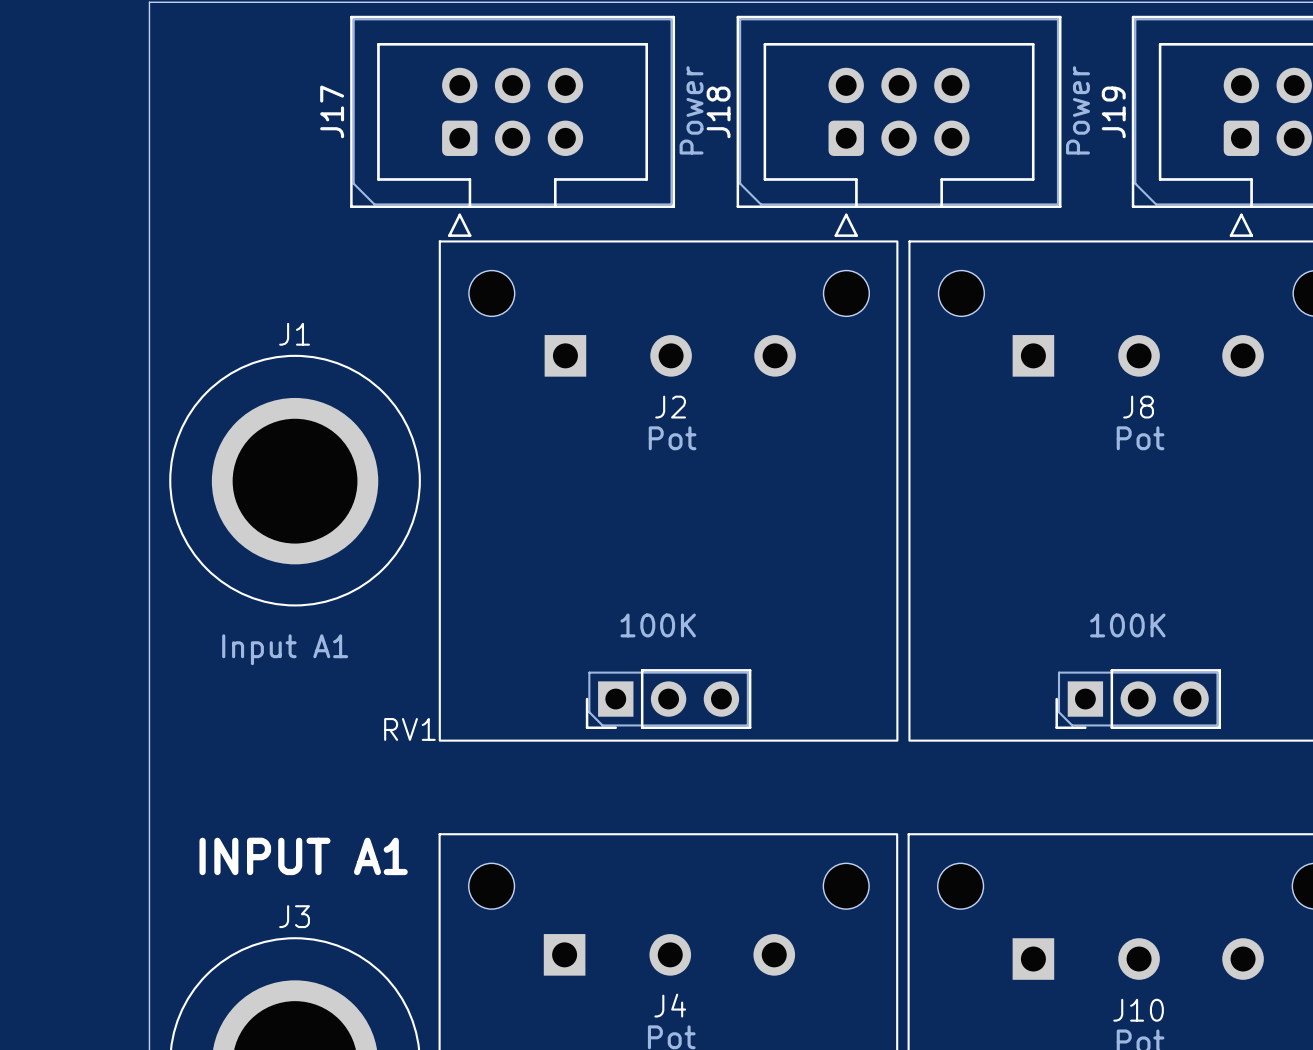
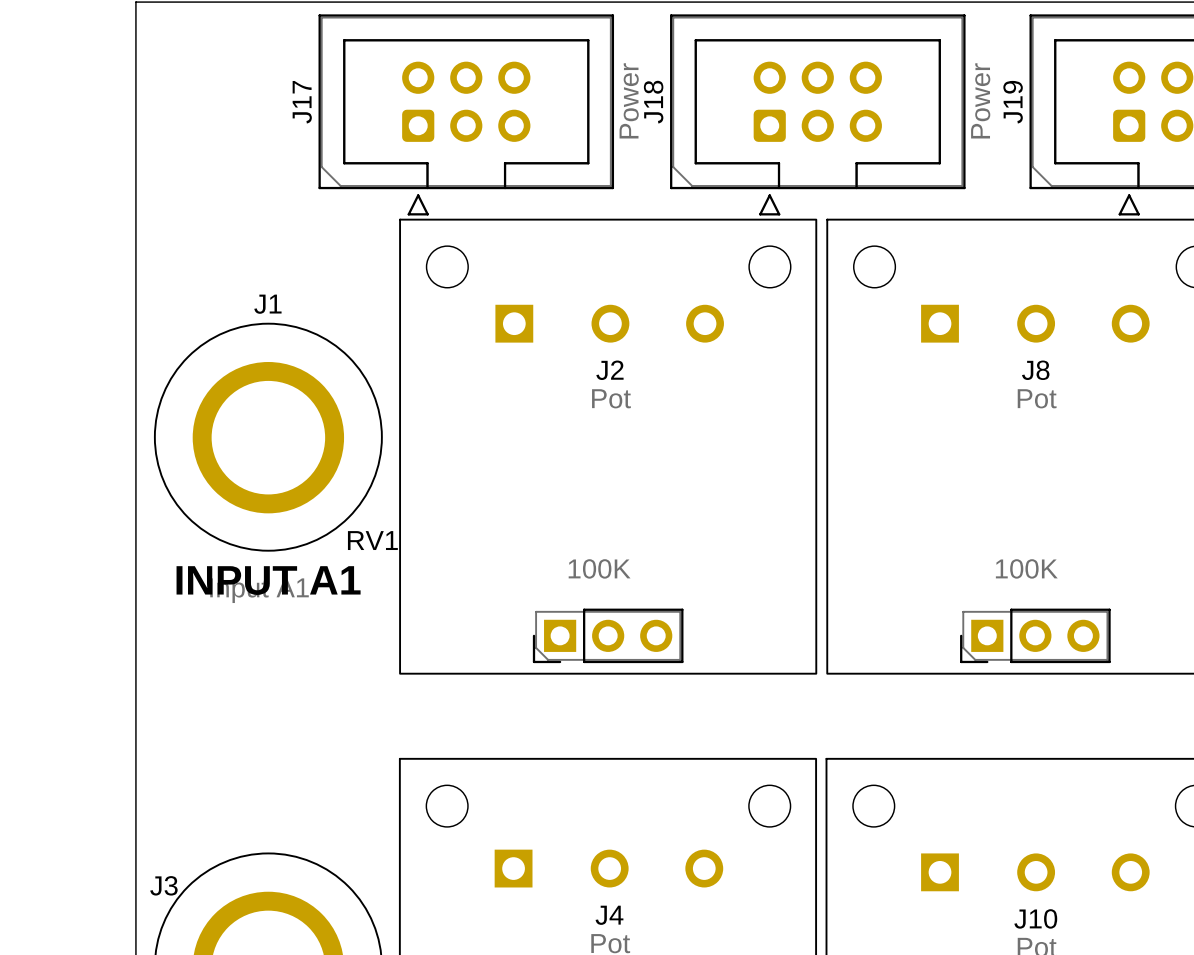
RV1 name position: RV1 (409, 729) -> RV1 (372, 540)
text position: INPUT A1 (303, 856) -> INPUT A1 (268, 580)
J3 name position: J3 (294, 916) -> J3 (163, 885)

